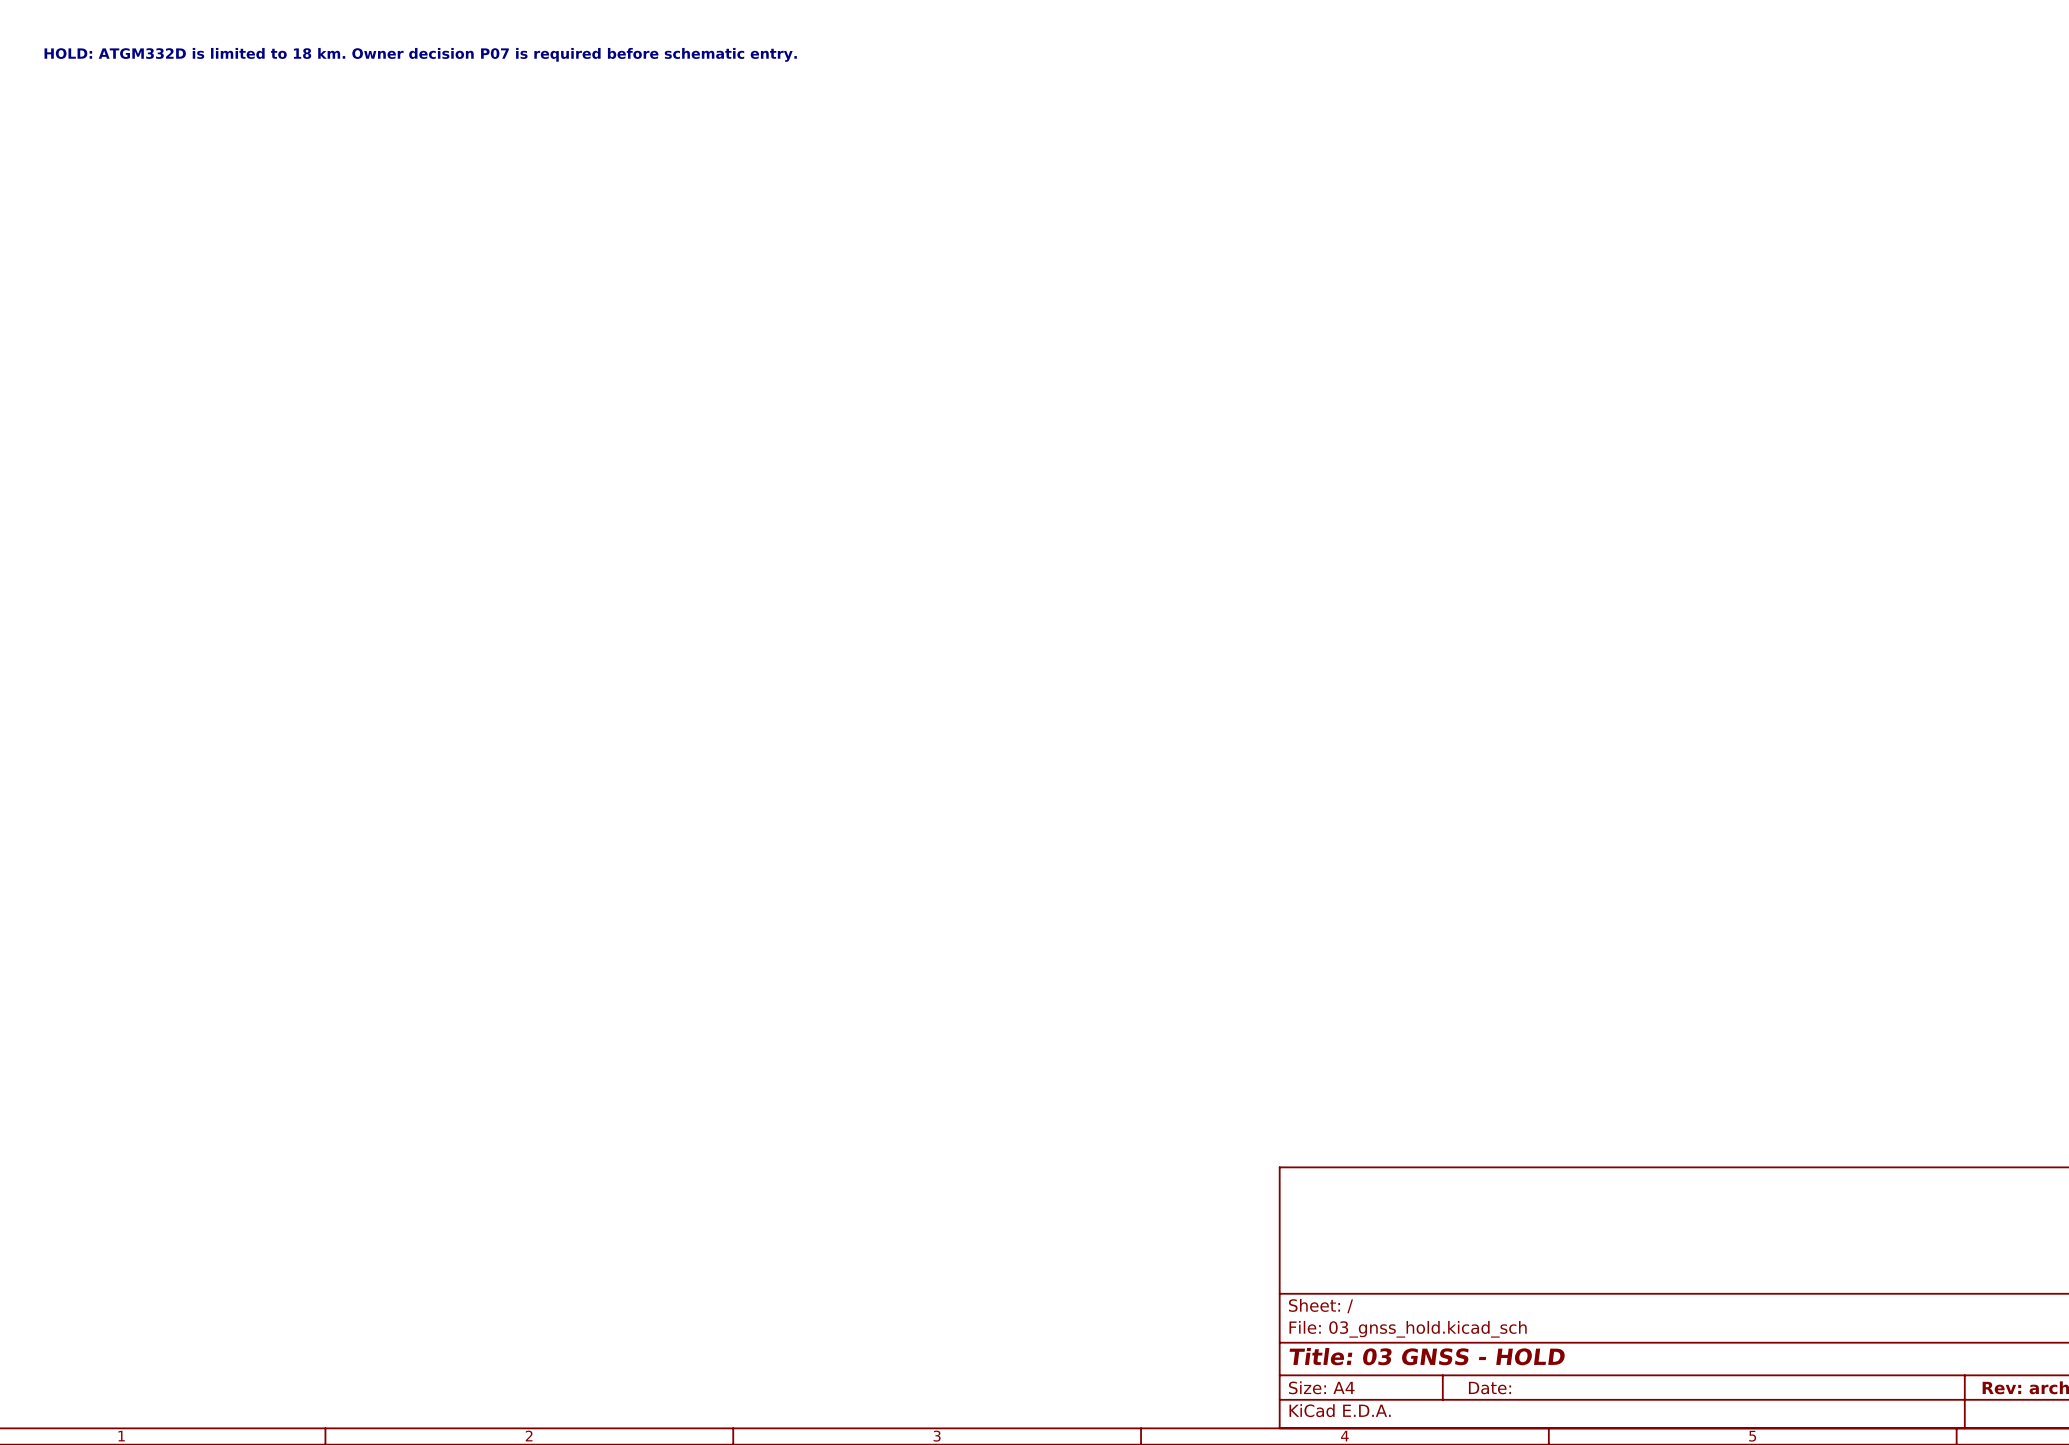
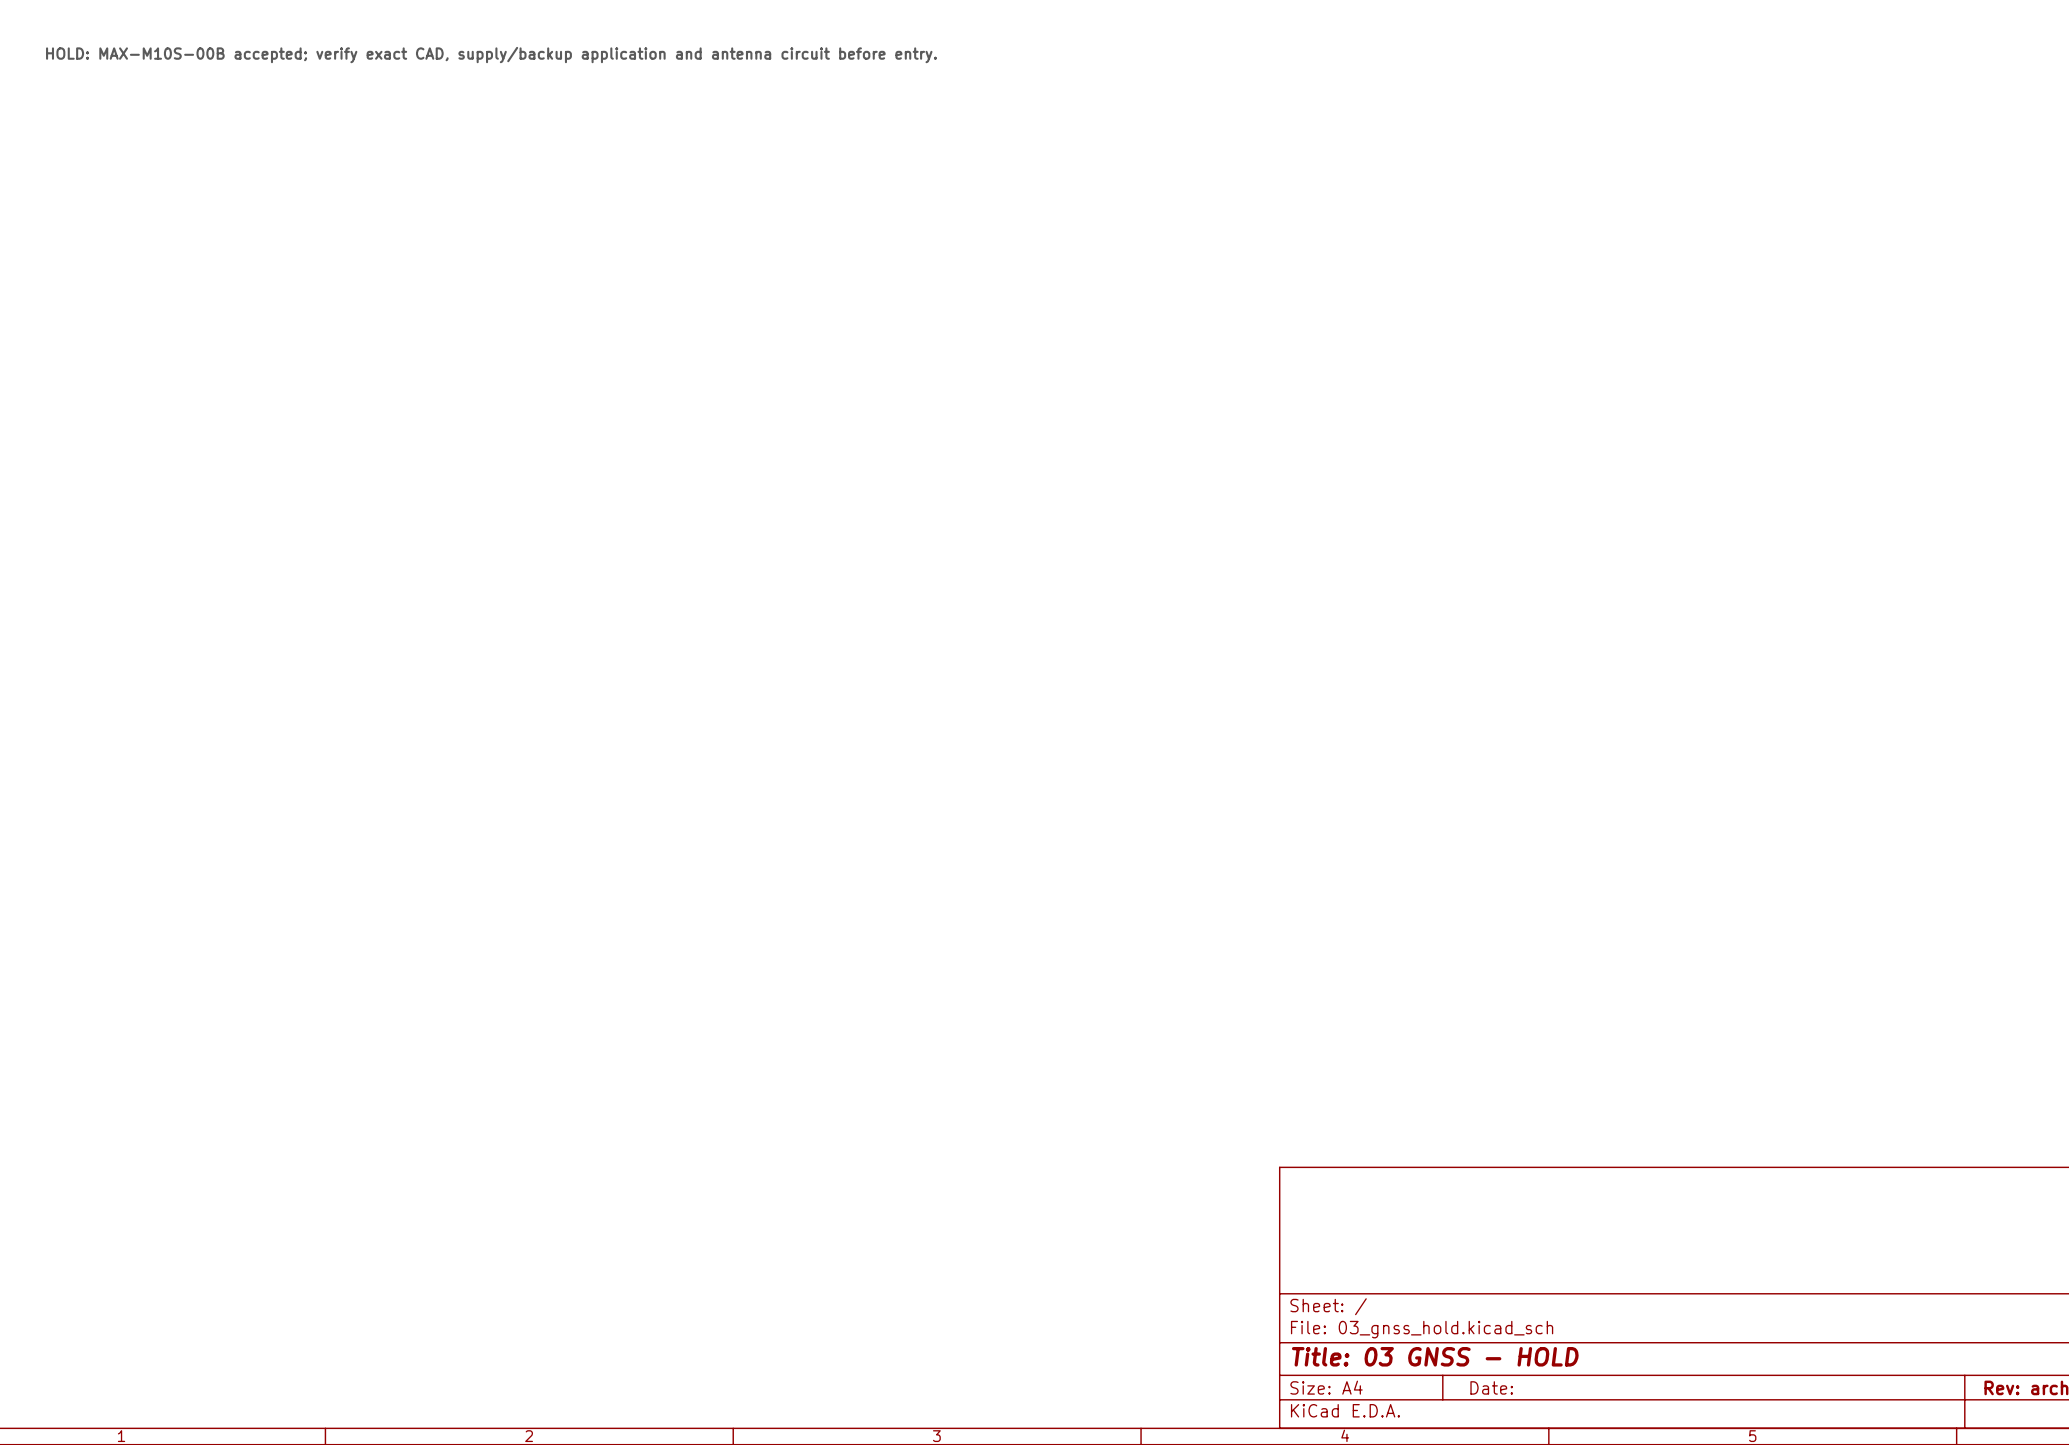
text: HOLD: ATGM332D is limited to 18 km. Owner decision P07 is required before schematic entry. (420, 54) -> HOLD: MAX-M10S-00B accepted; verify exact CAD, supply/backup application and antenna circuit before entry. (491, 55)

